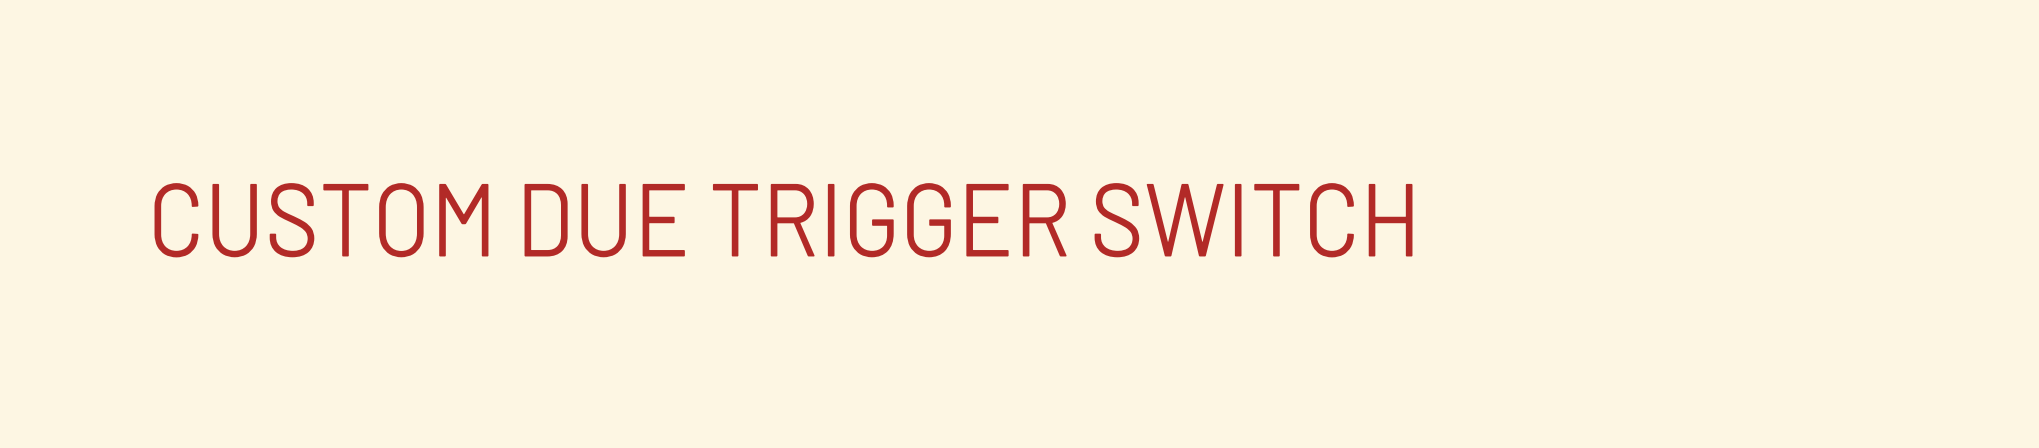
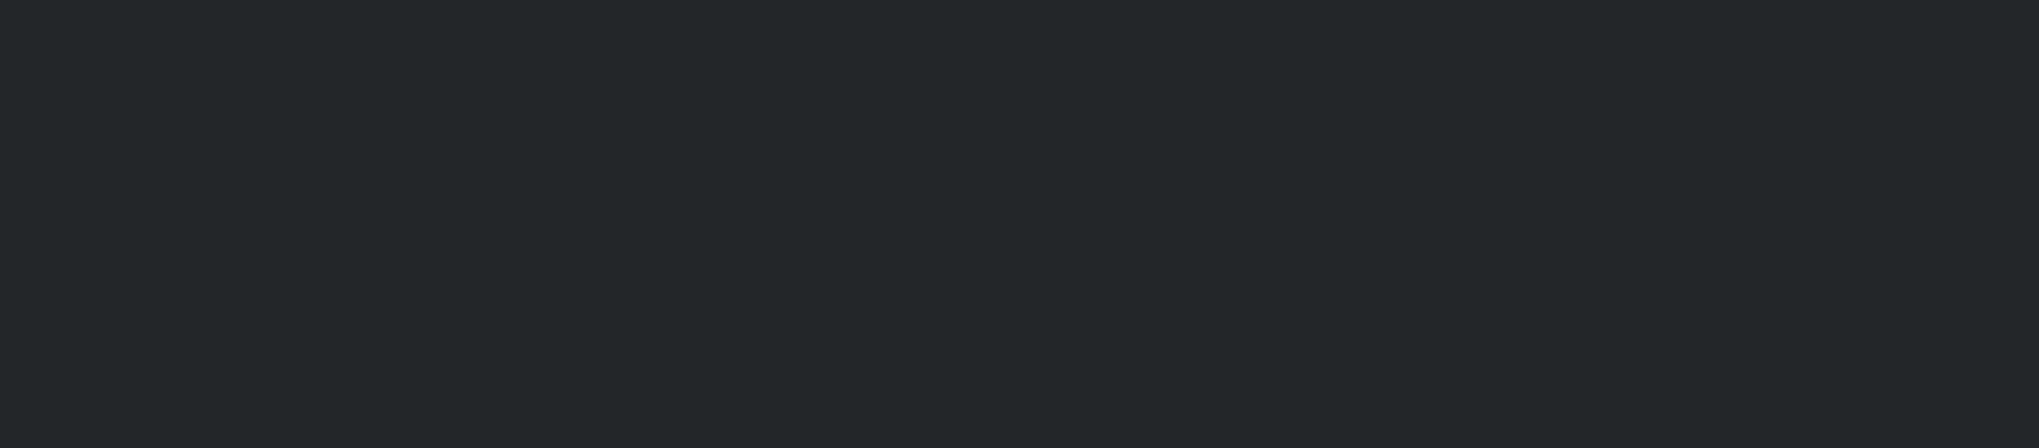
text: CUSTOM DUE TRIGGER SWITCH (783, 220) -> none

